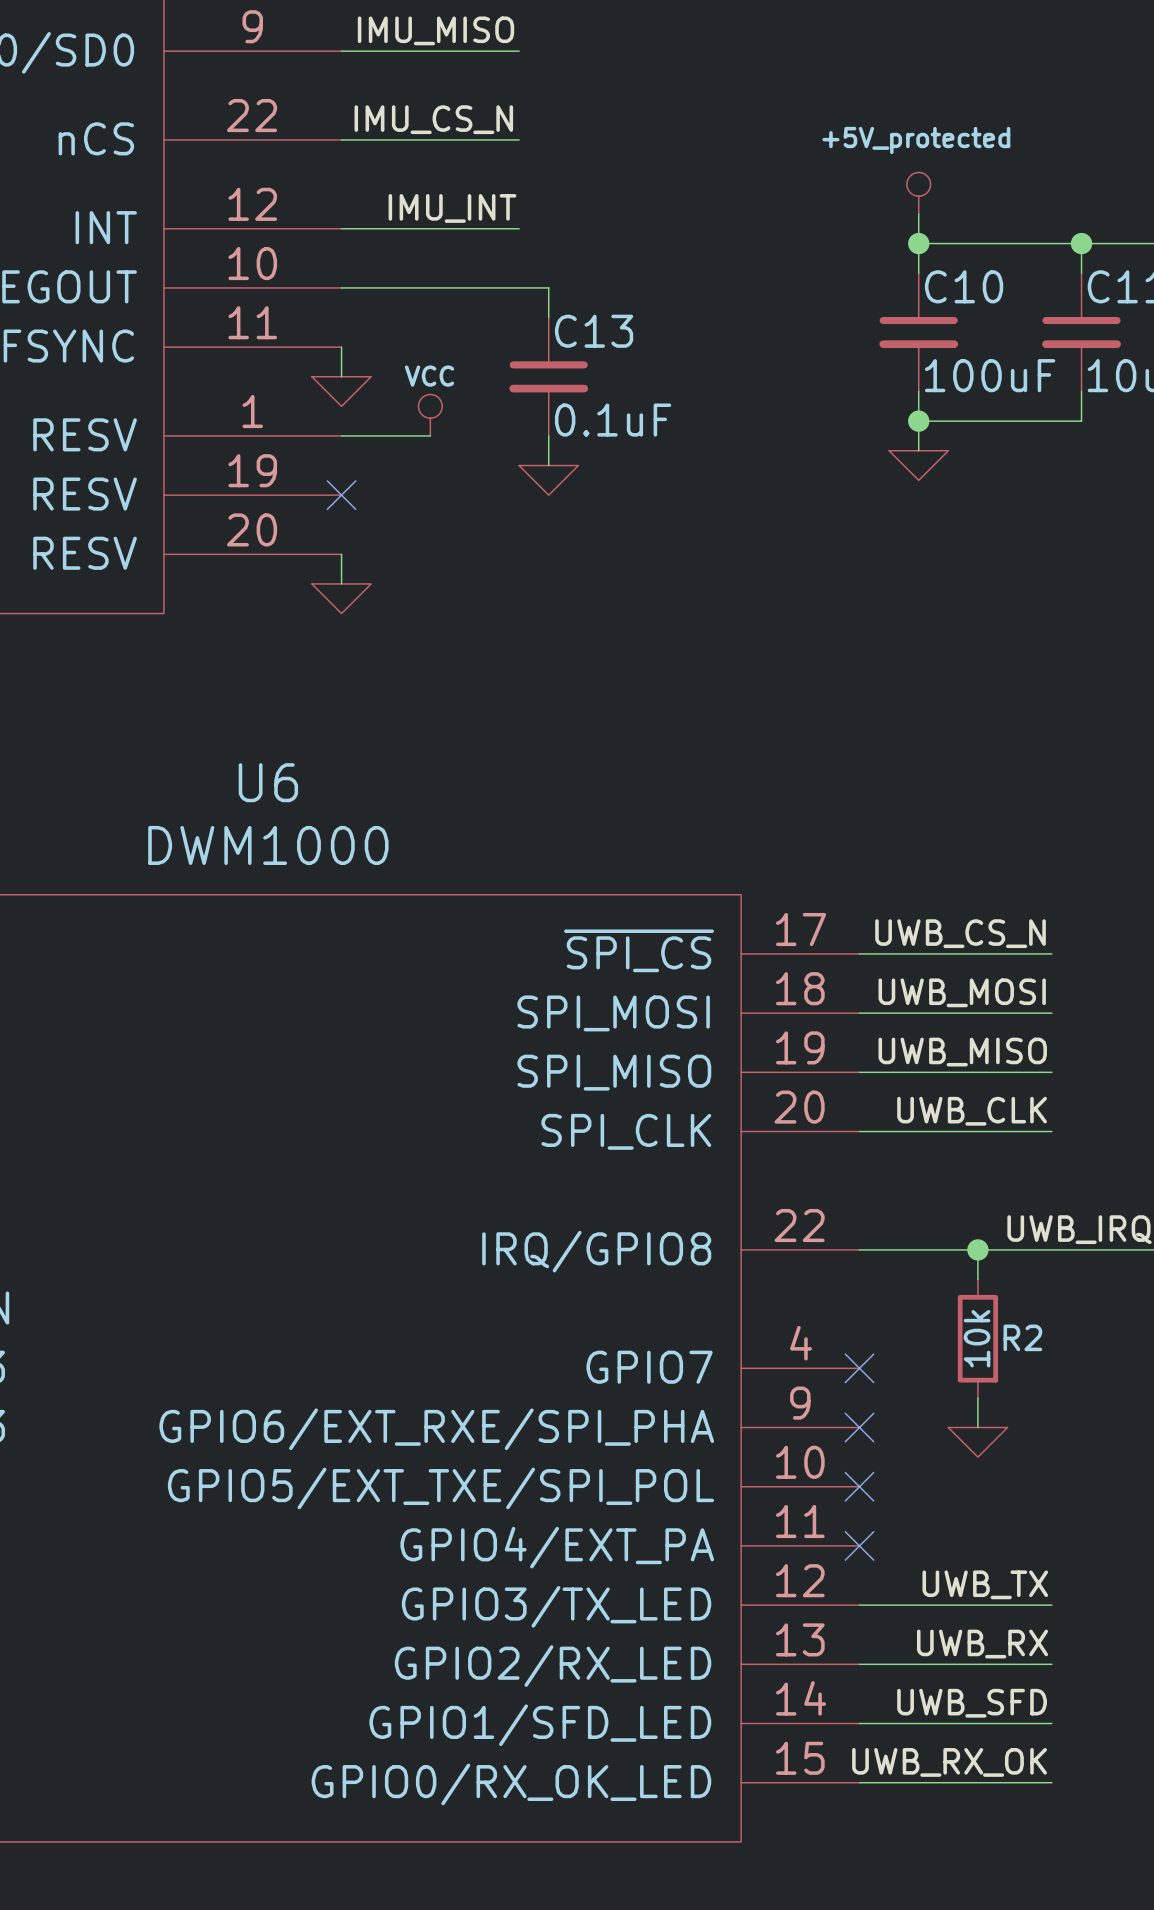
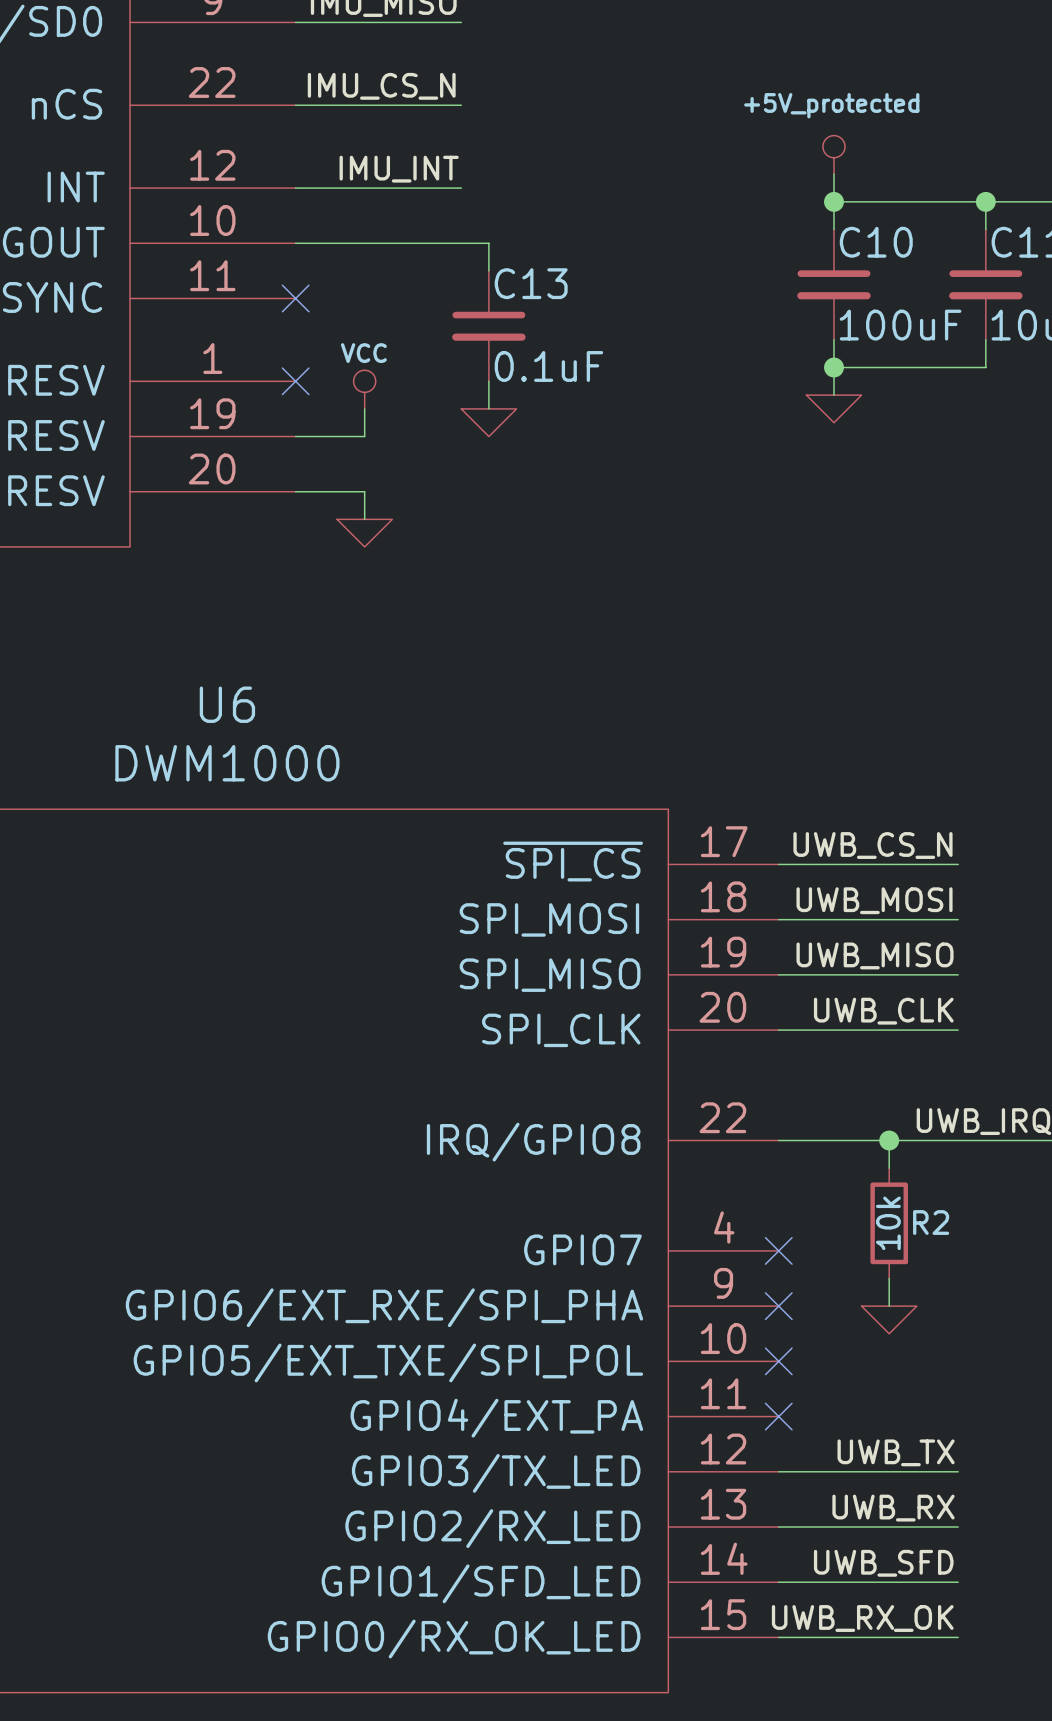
wire: (341, 347) (341, 376) -> none
no-connect mark: none -> (295, 298)
power symbol: (341, 391) -> none
power symbol position: VCC (430, 415) -> VCC (364, 389)
wire: (341, 435) (430, 435) -> none
wire: none -> (364, 408) (364, 436) (295, 436)
no-connect mark position: (341, 495) -> (295, 381)
wire: (341, 554) (341, 583) -> (295, 491) (364, 491) (364, 519)
power symbol position: (341, 598) -> (364, 533)

